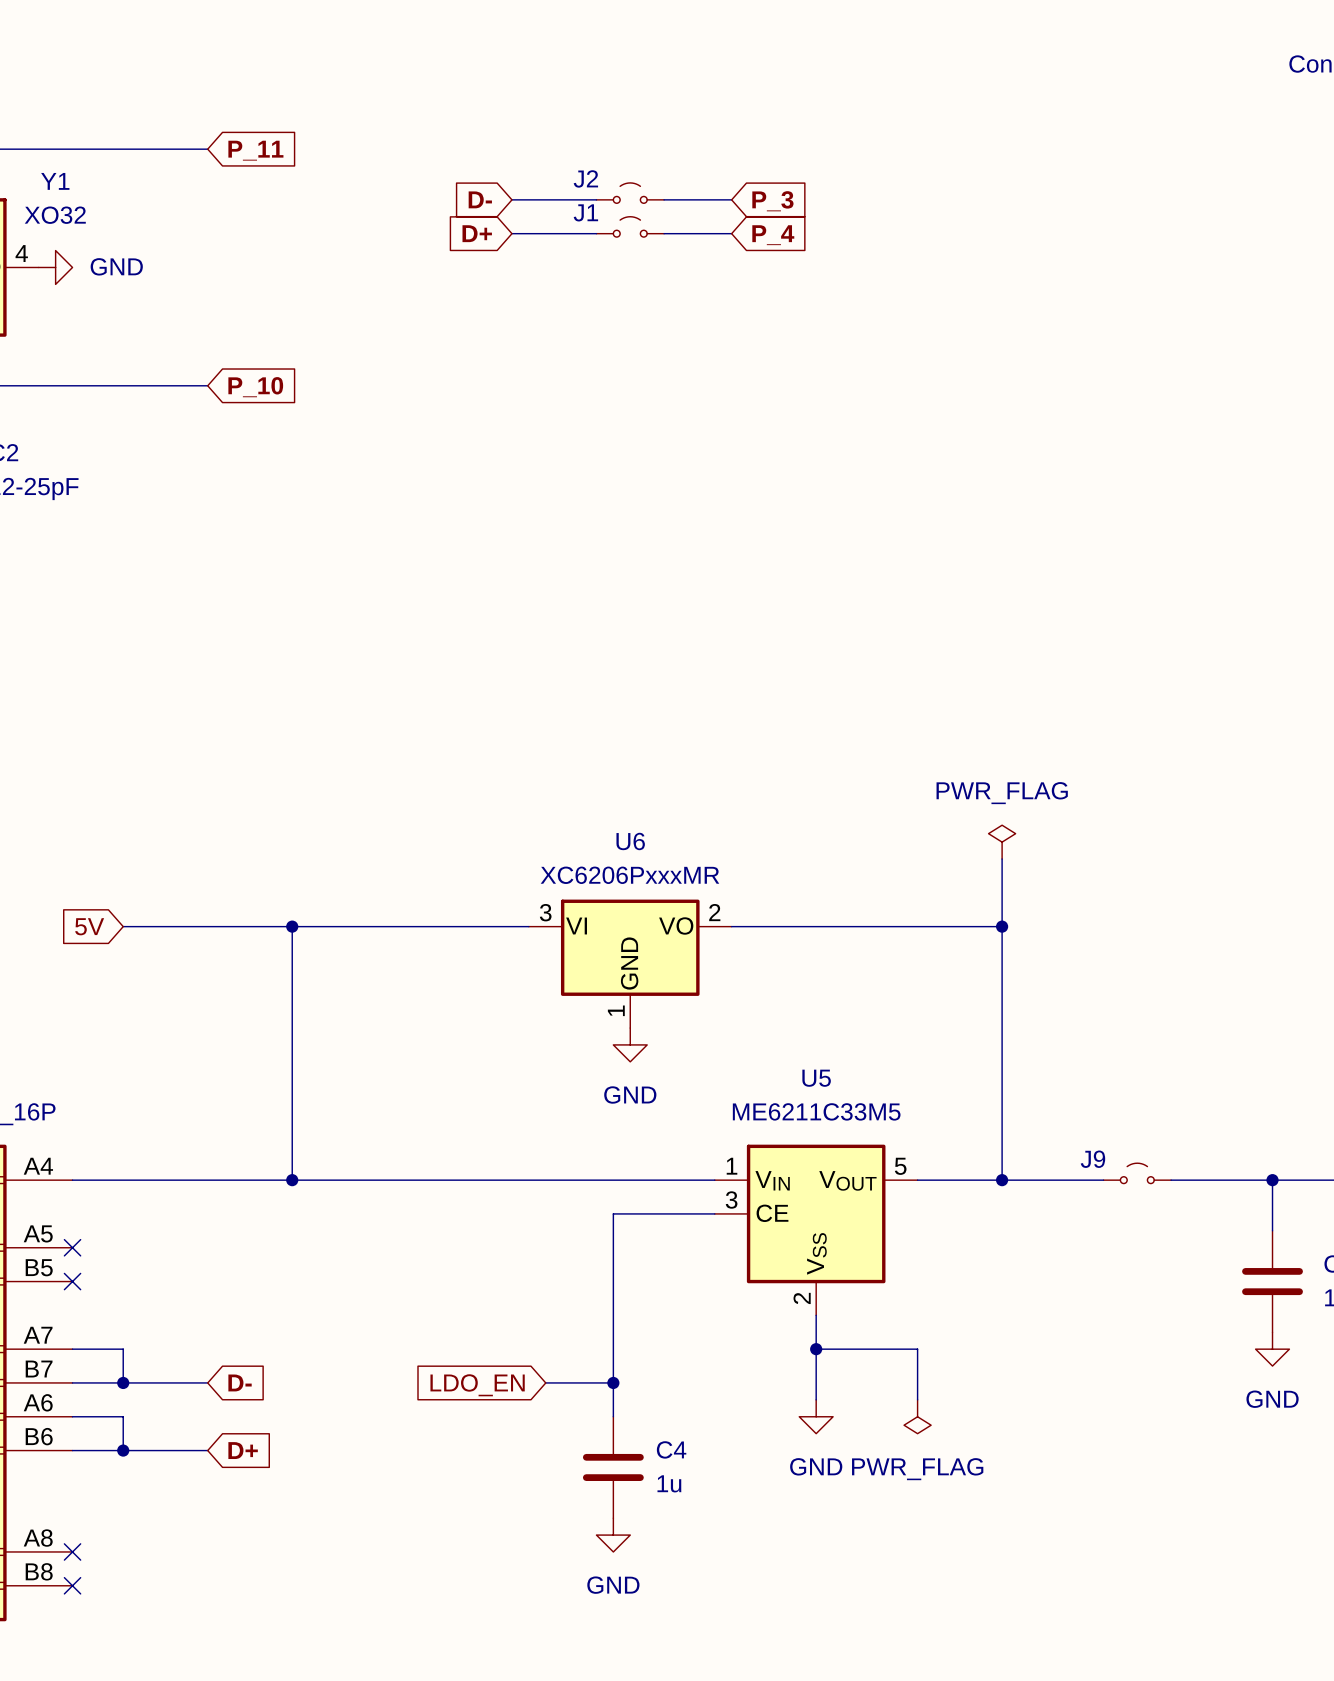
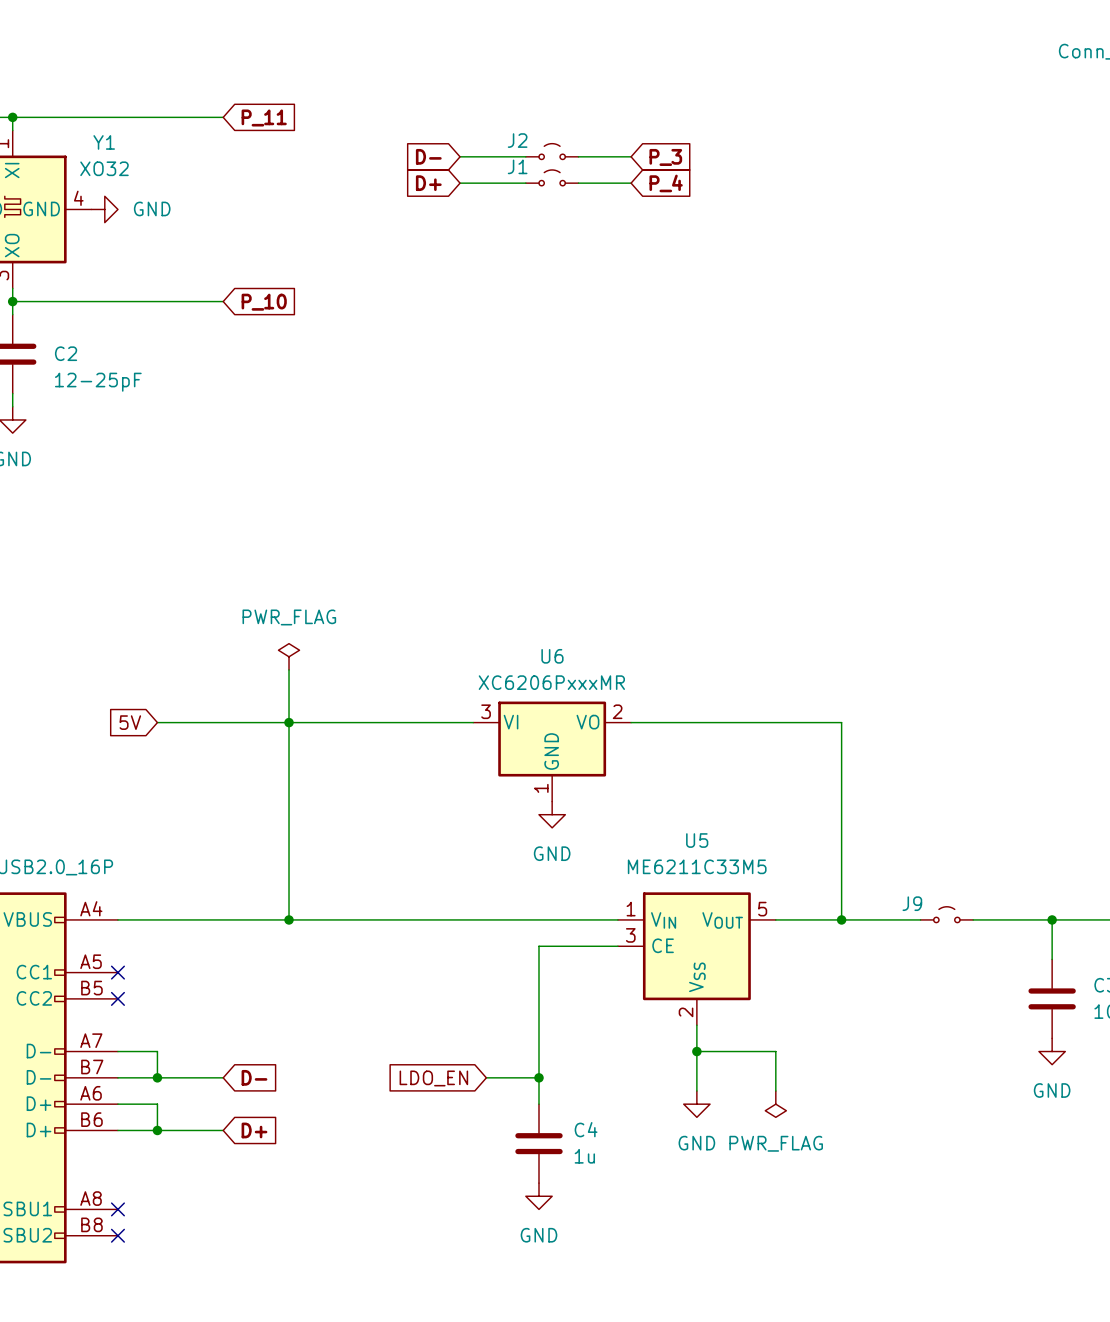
power symbol: none -> PWR_FLAG (289, 656)
power symbol: PWR_FLAG (1002, 842) -> none
wire: none -> (289, 669) (289, 722)
wire: (1002, 859) (1002, 926) -> none
junction: (1002, 926) -> none

